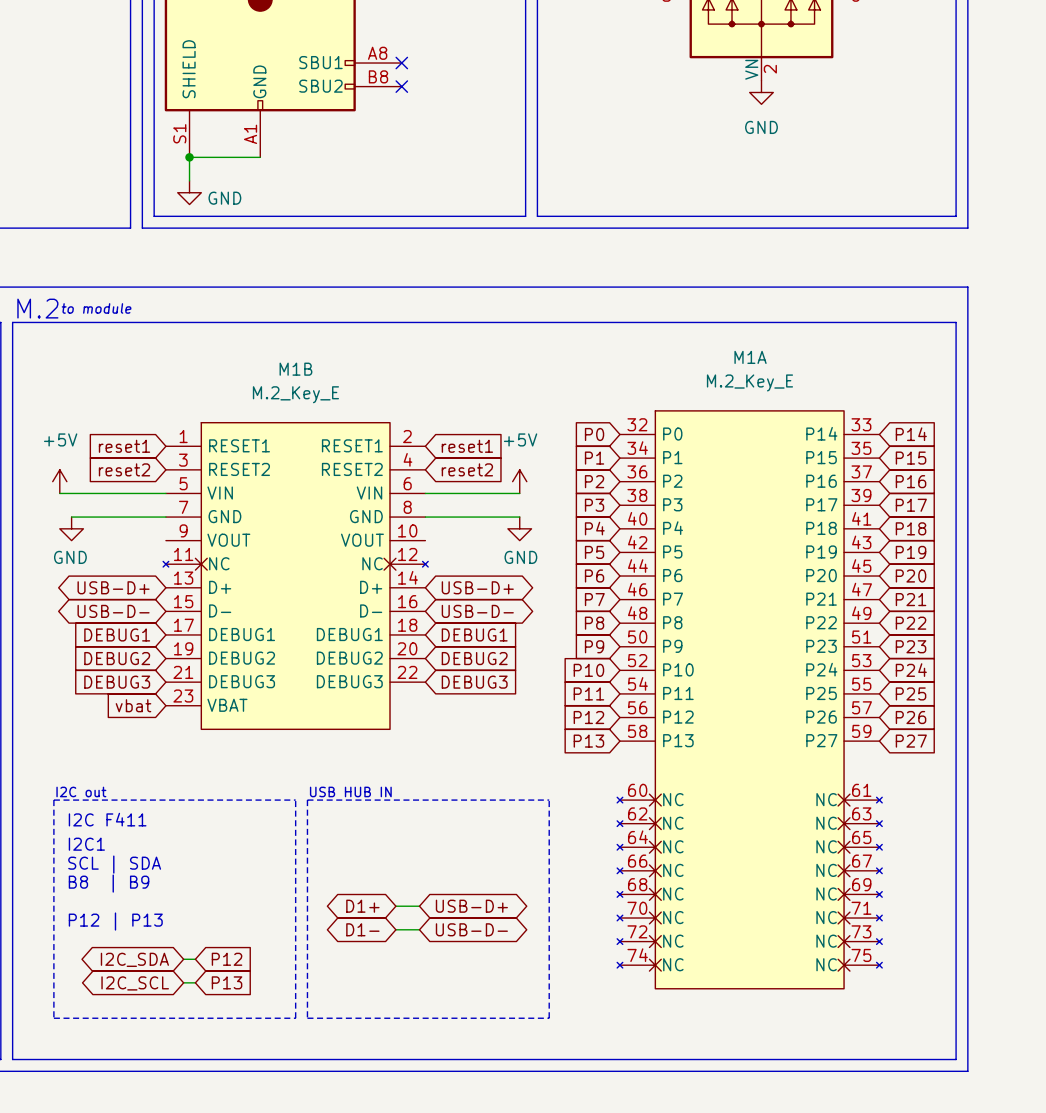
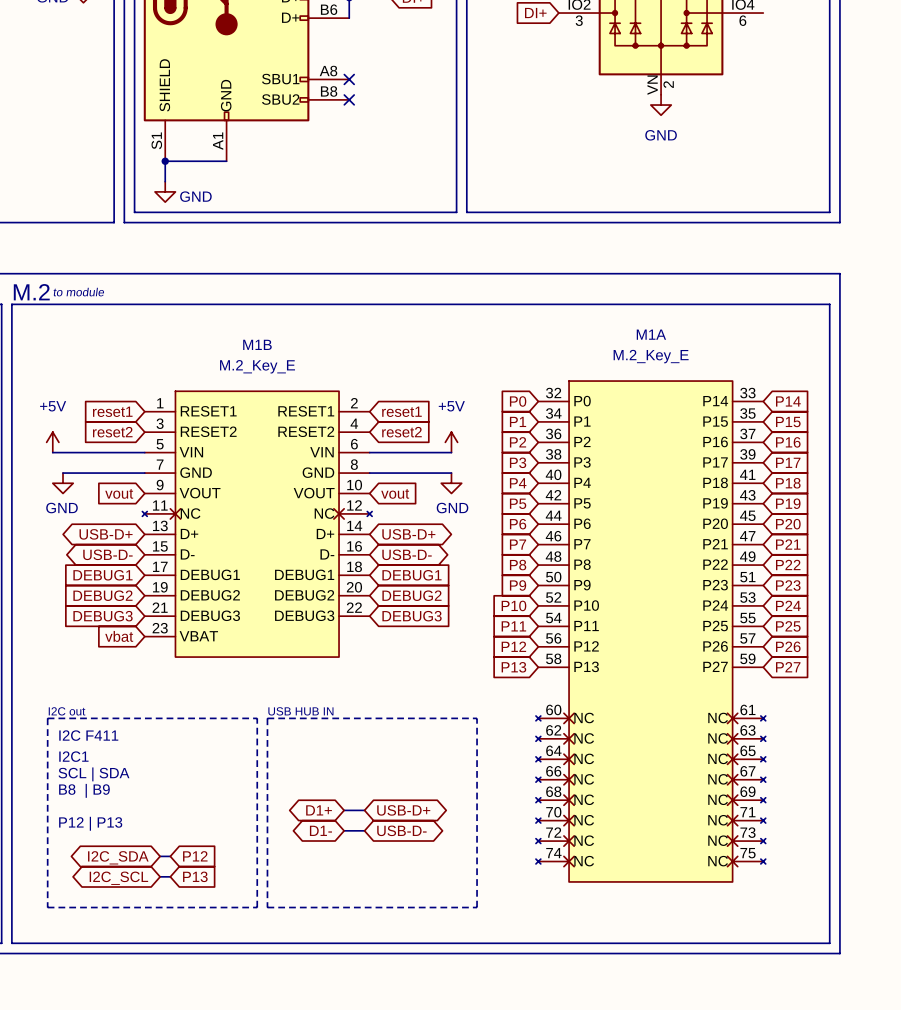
global label: none -> vout (119, 493)
global label: none -> vout (395, 493)

